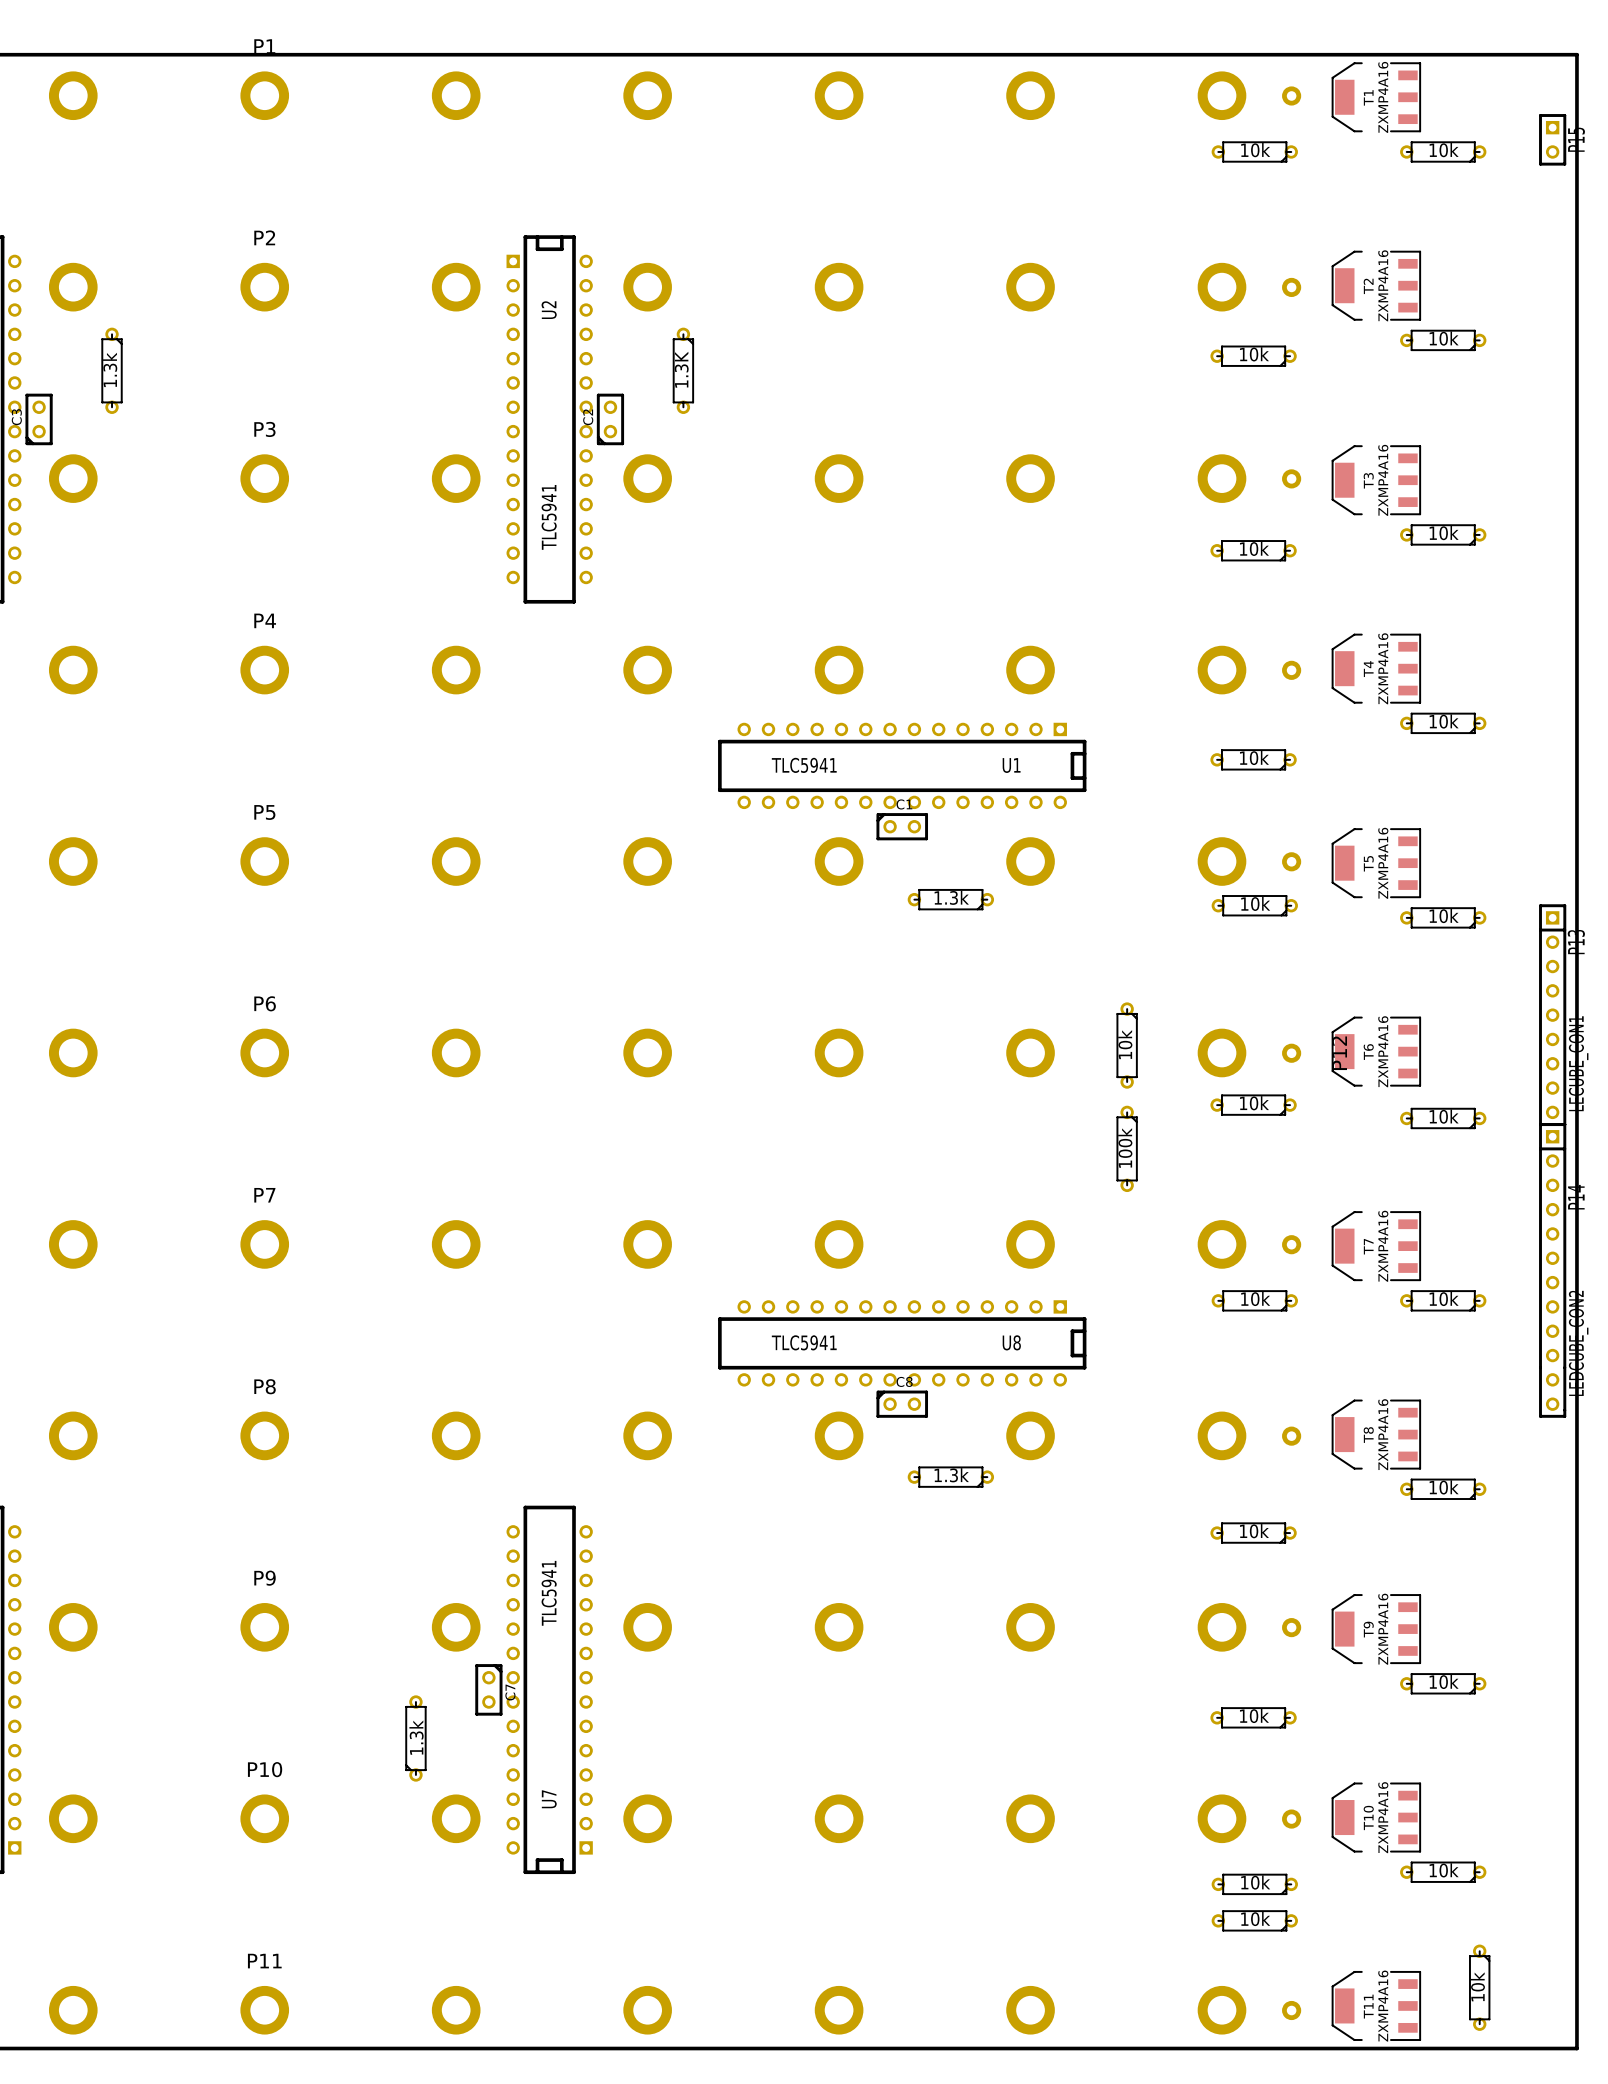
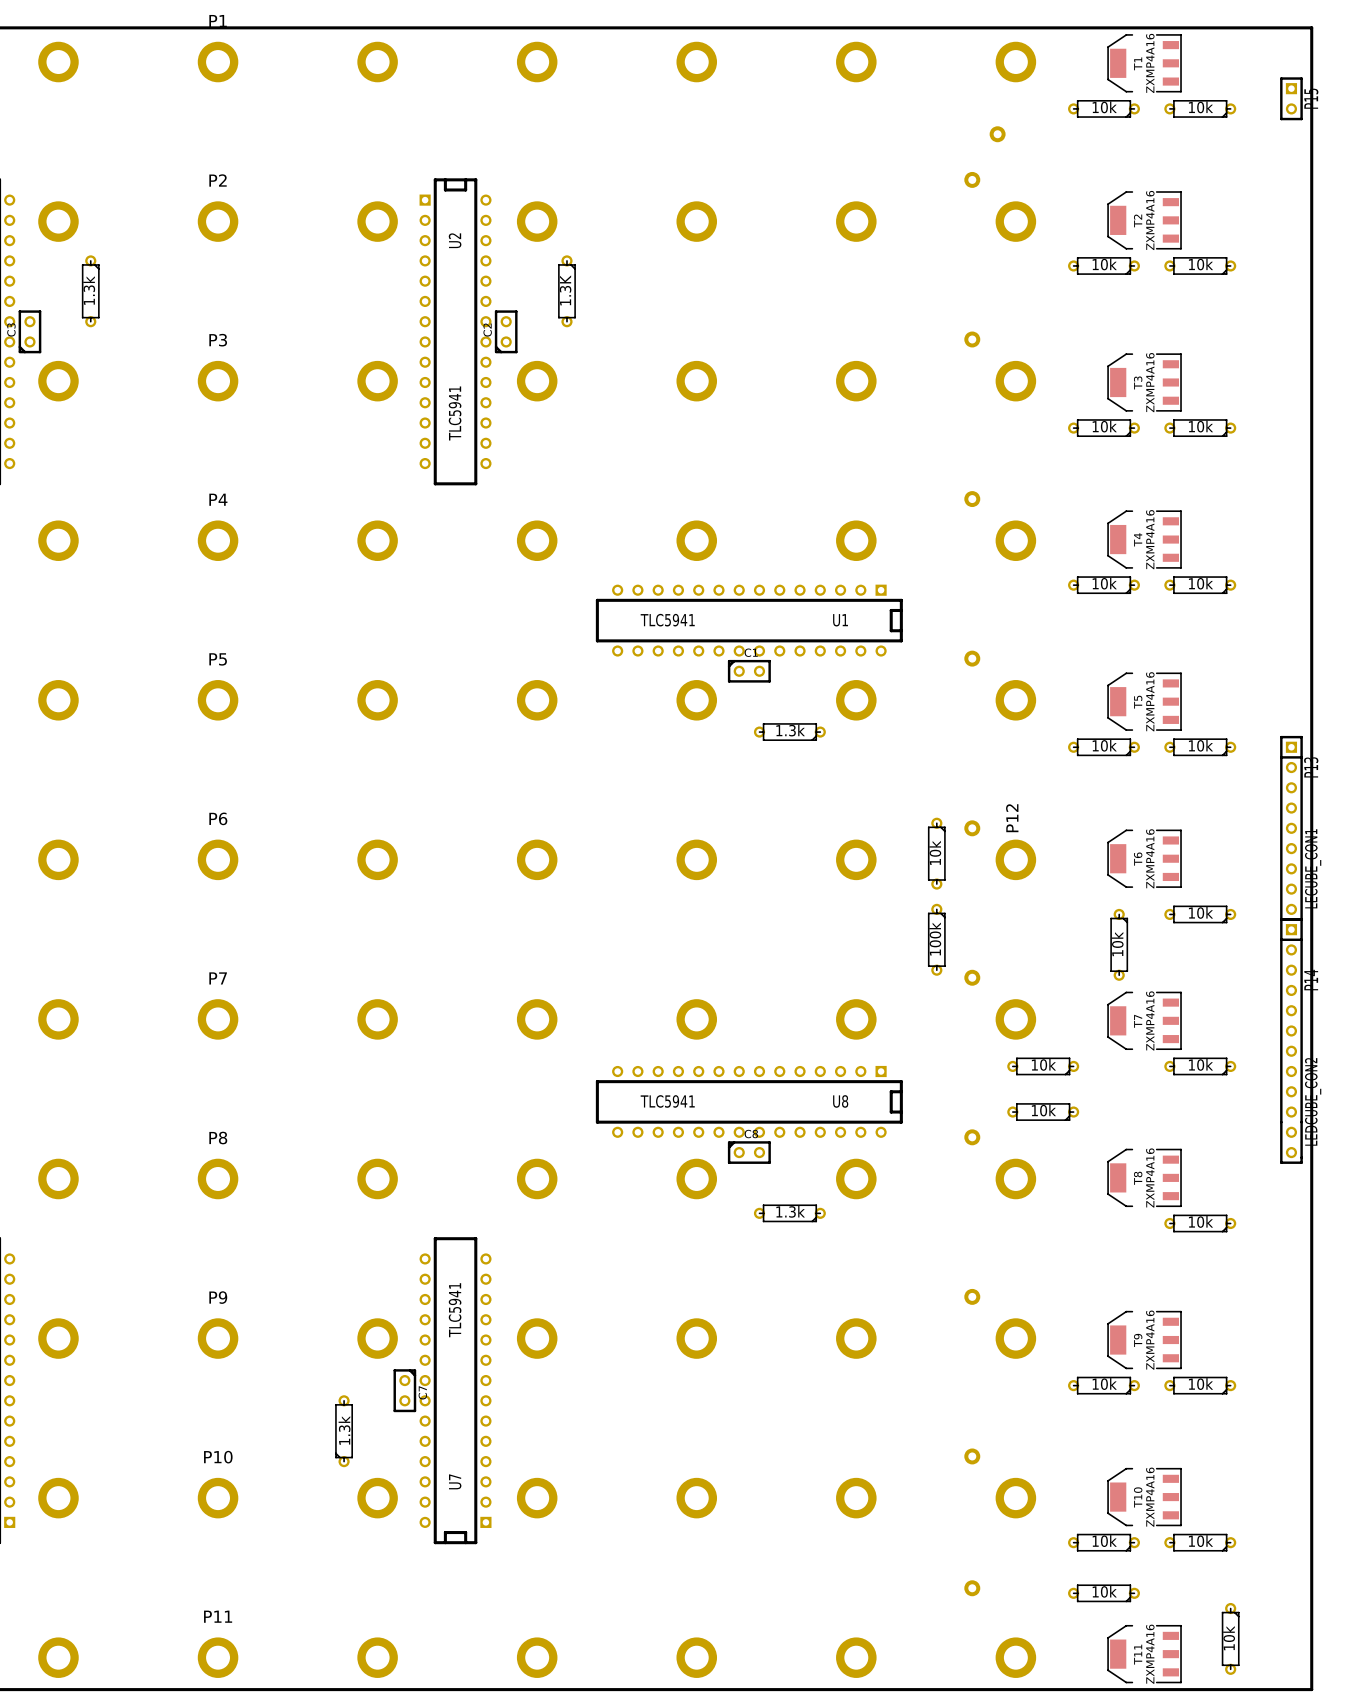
P12 footprint: [1282, 86, 1302, 2021] -> [964, 126, 1006, 1597]
part position: (1254, 151) -> (1104, 108)
part position: (1253, 356) -> (1104, 265)
part position: (1253, 550) -> (1104, 428)
part position: (1253, 759) -> (1104, 585)
part position: (1254, 905) -> (1104, 747)
P12 name position: P12 (1339, 1053) -> P12 (1012, 818)
part: 10k (1253, 1105) -> none
part: none -> 10k (1119, 944)
part: none -> 10k (1043, 1112)
part: 10k (1253, 1533) -> none
part position: (1253, 1717) -> (1104, 1385)
part: none -> 10k (1104, 1542)
part: 10k (1254, 1884) -> none
part: 10k (1254, 1920) -> none
part: none -> 10k (1104, 1593)

